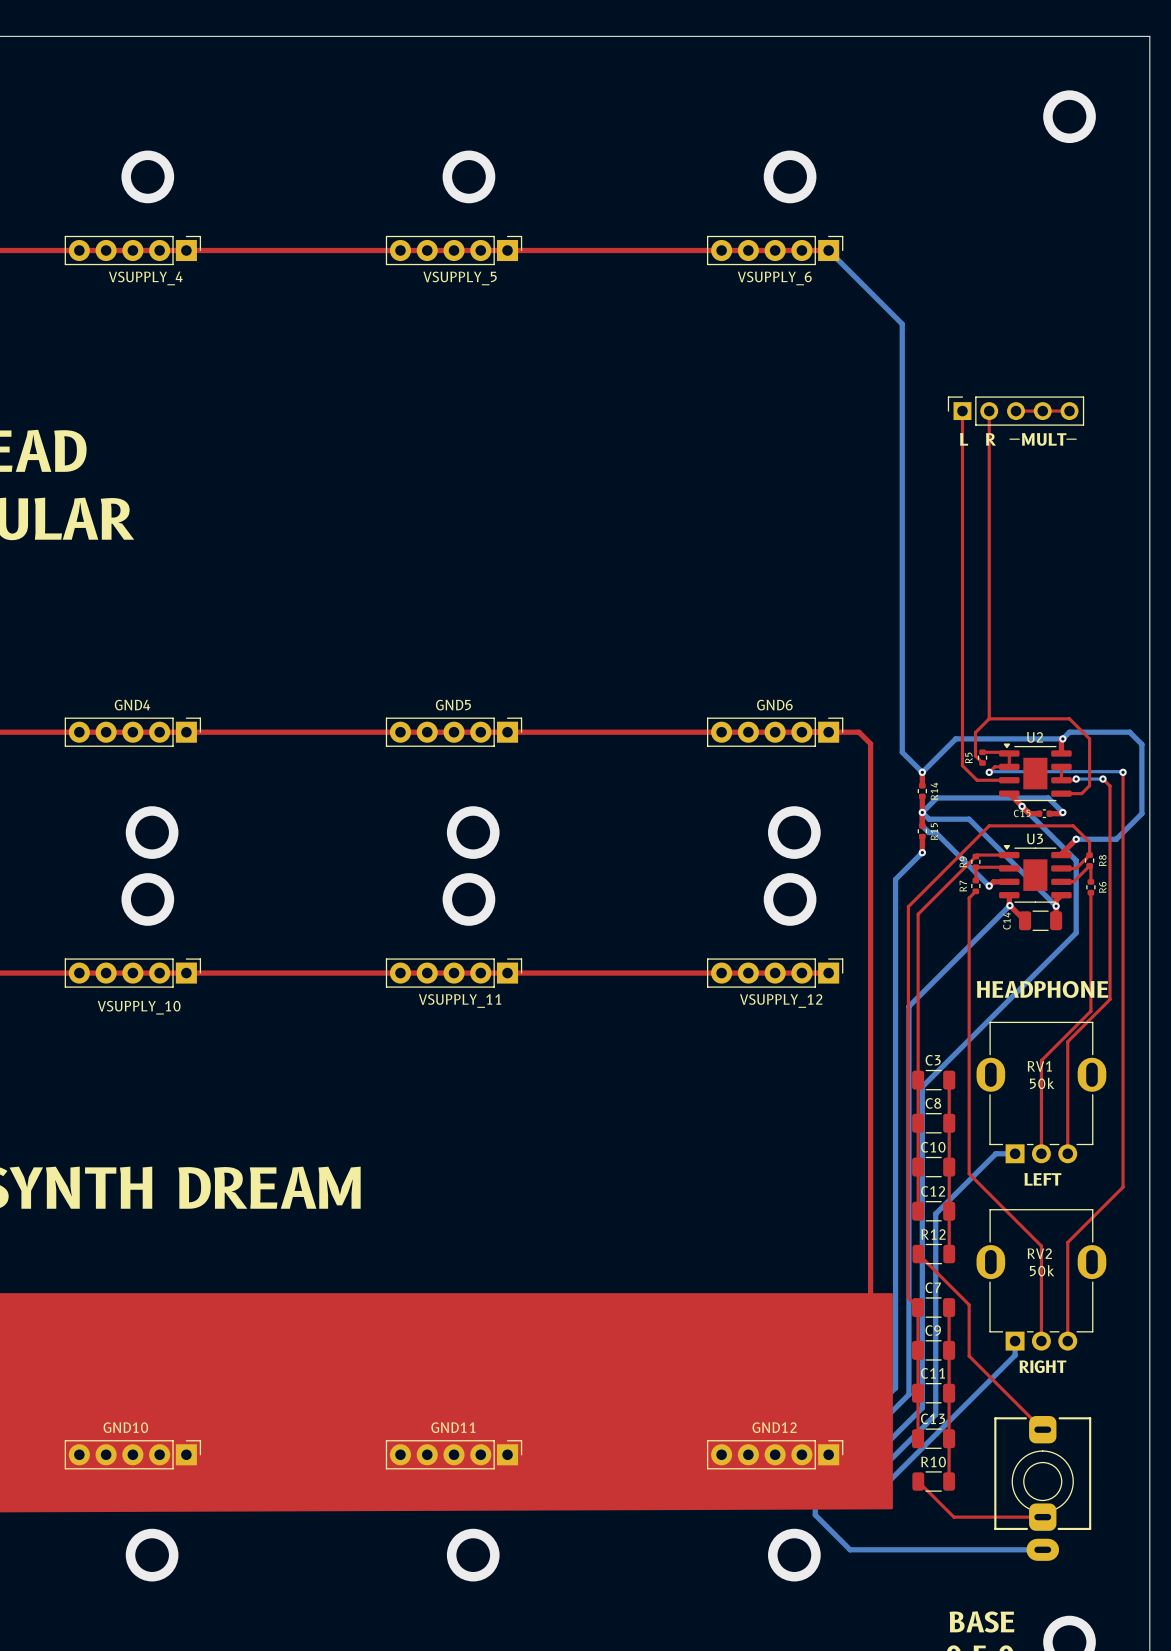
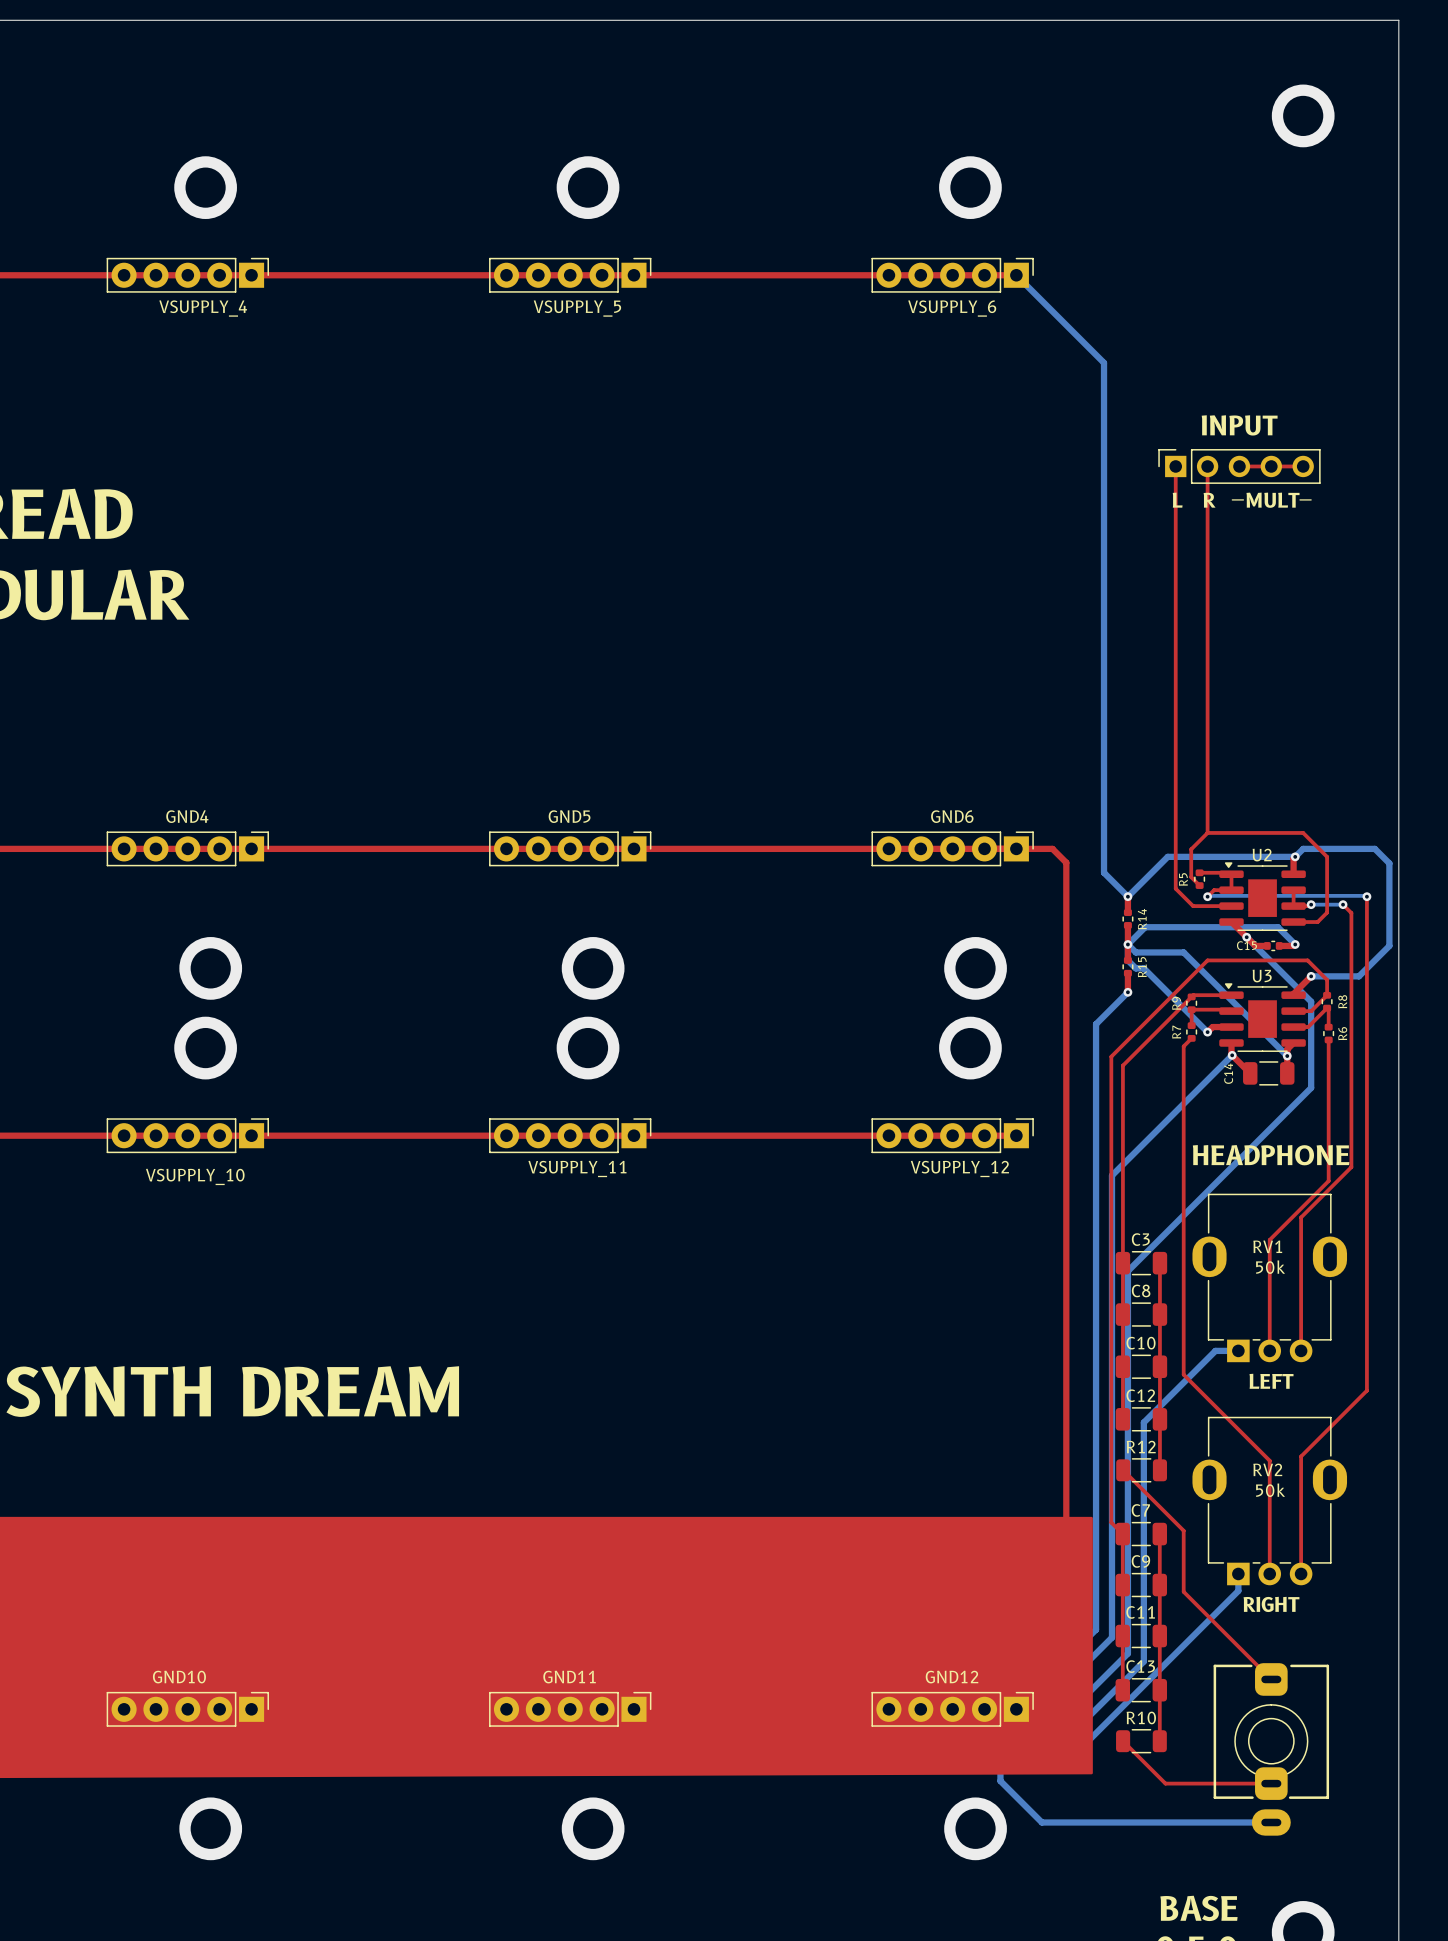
text: none -> INPUT (1239, 425)

